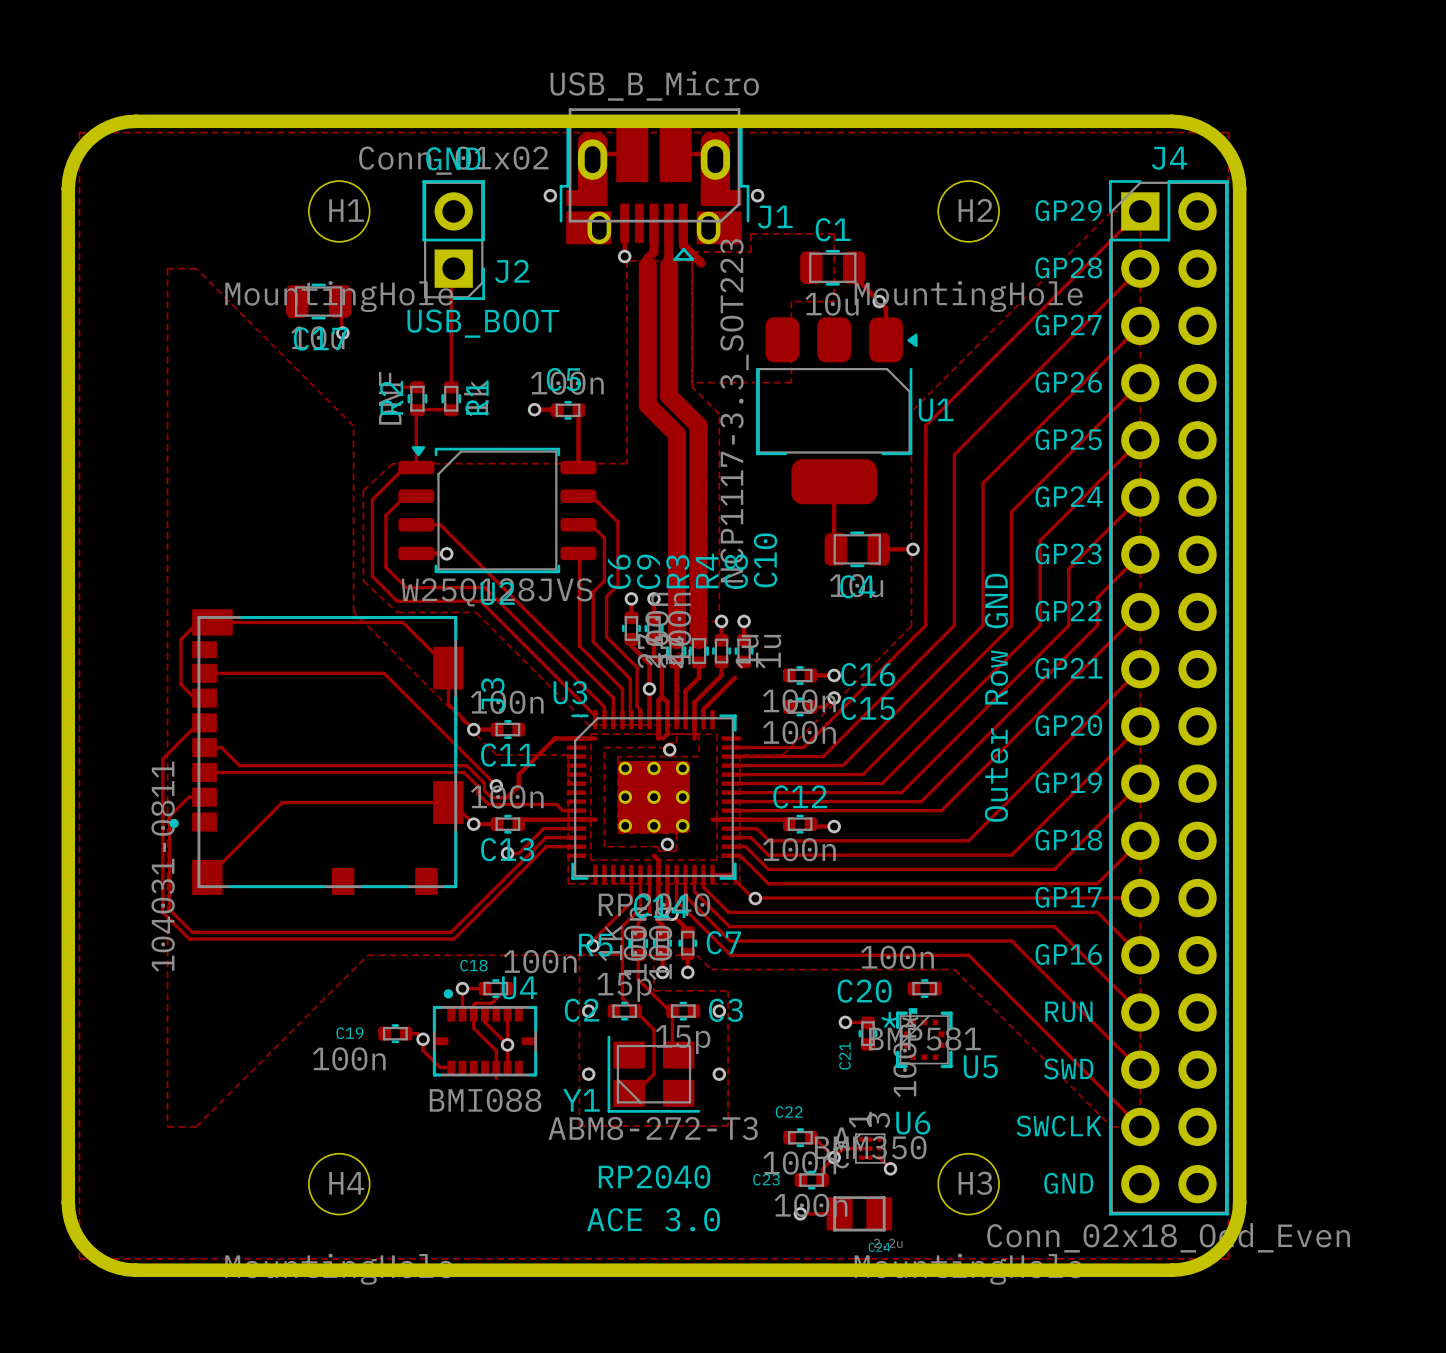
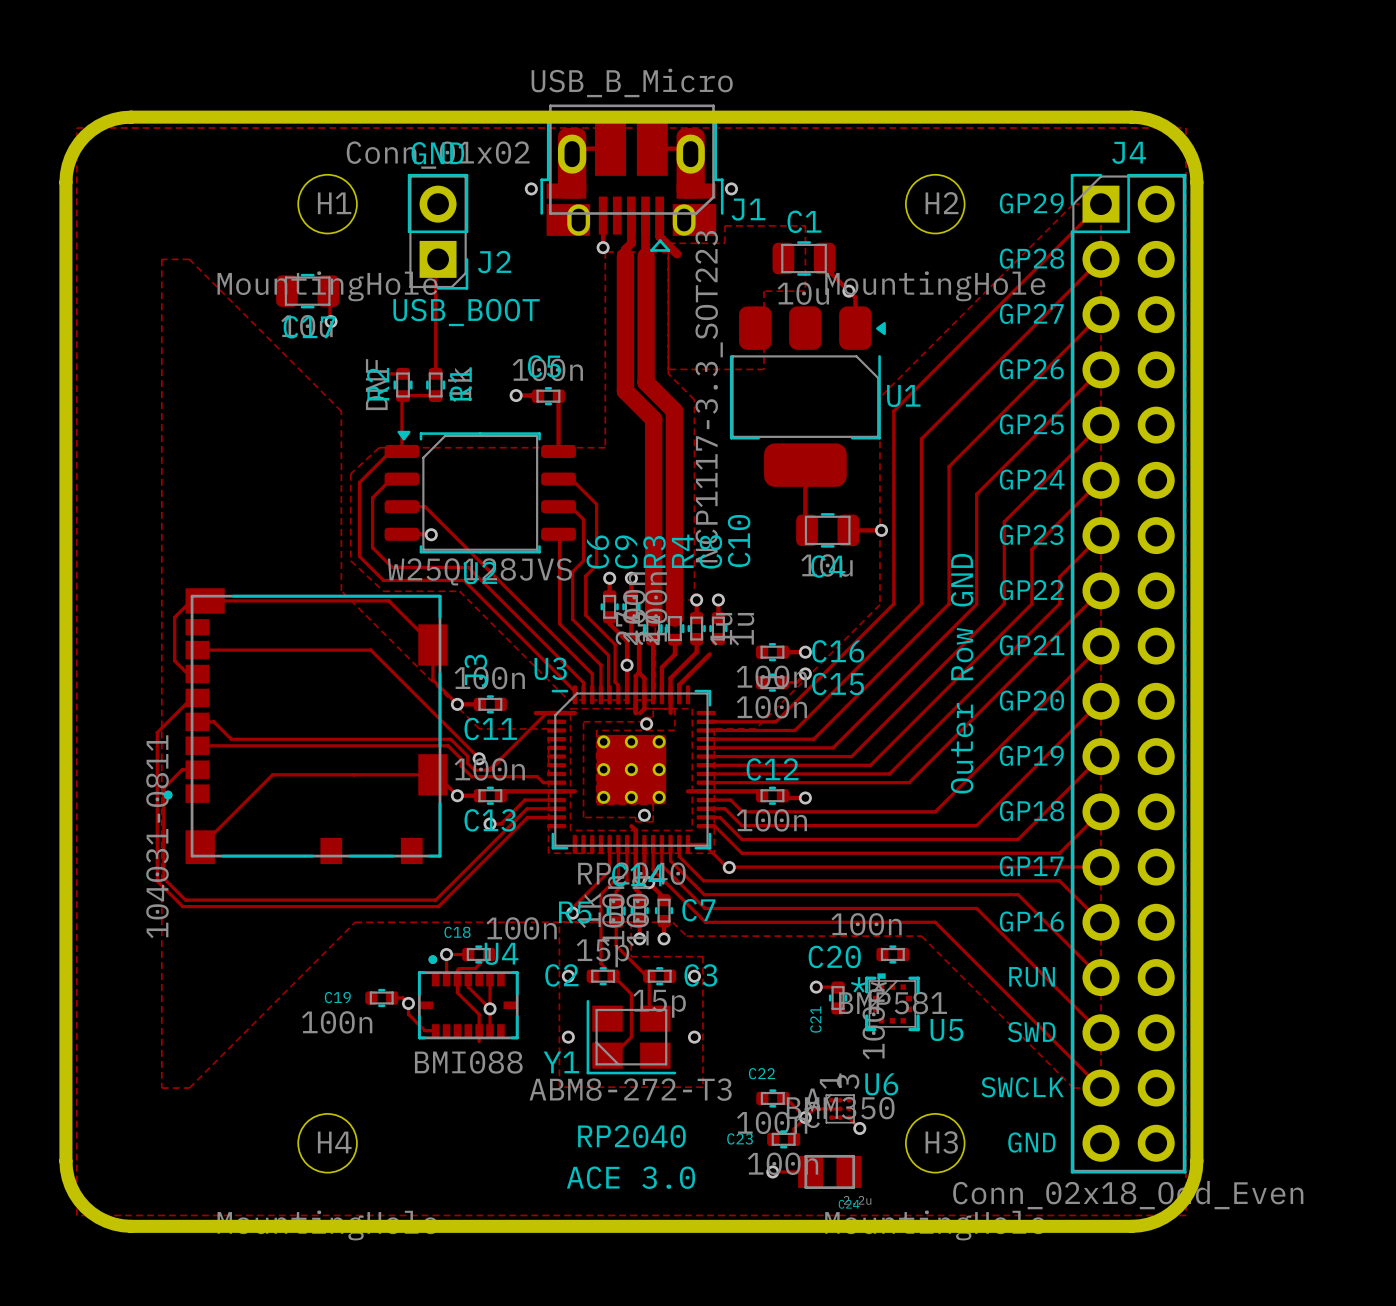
track: (554, 738) (518, 774) (518, 785) -> (556, 713) (546, 713) (500, 758)

